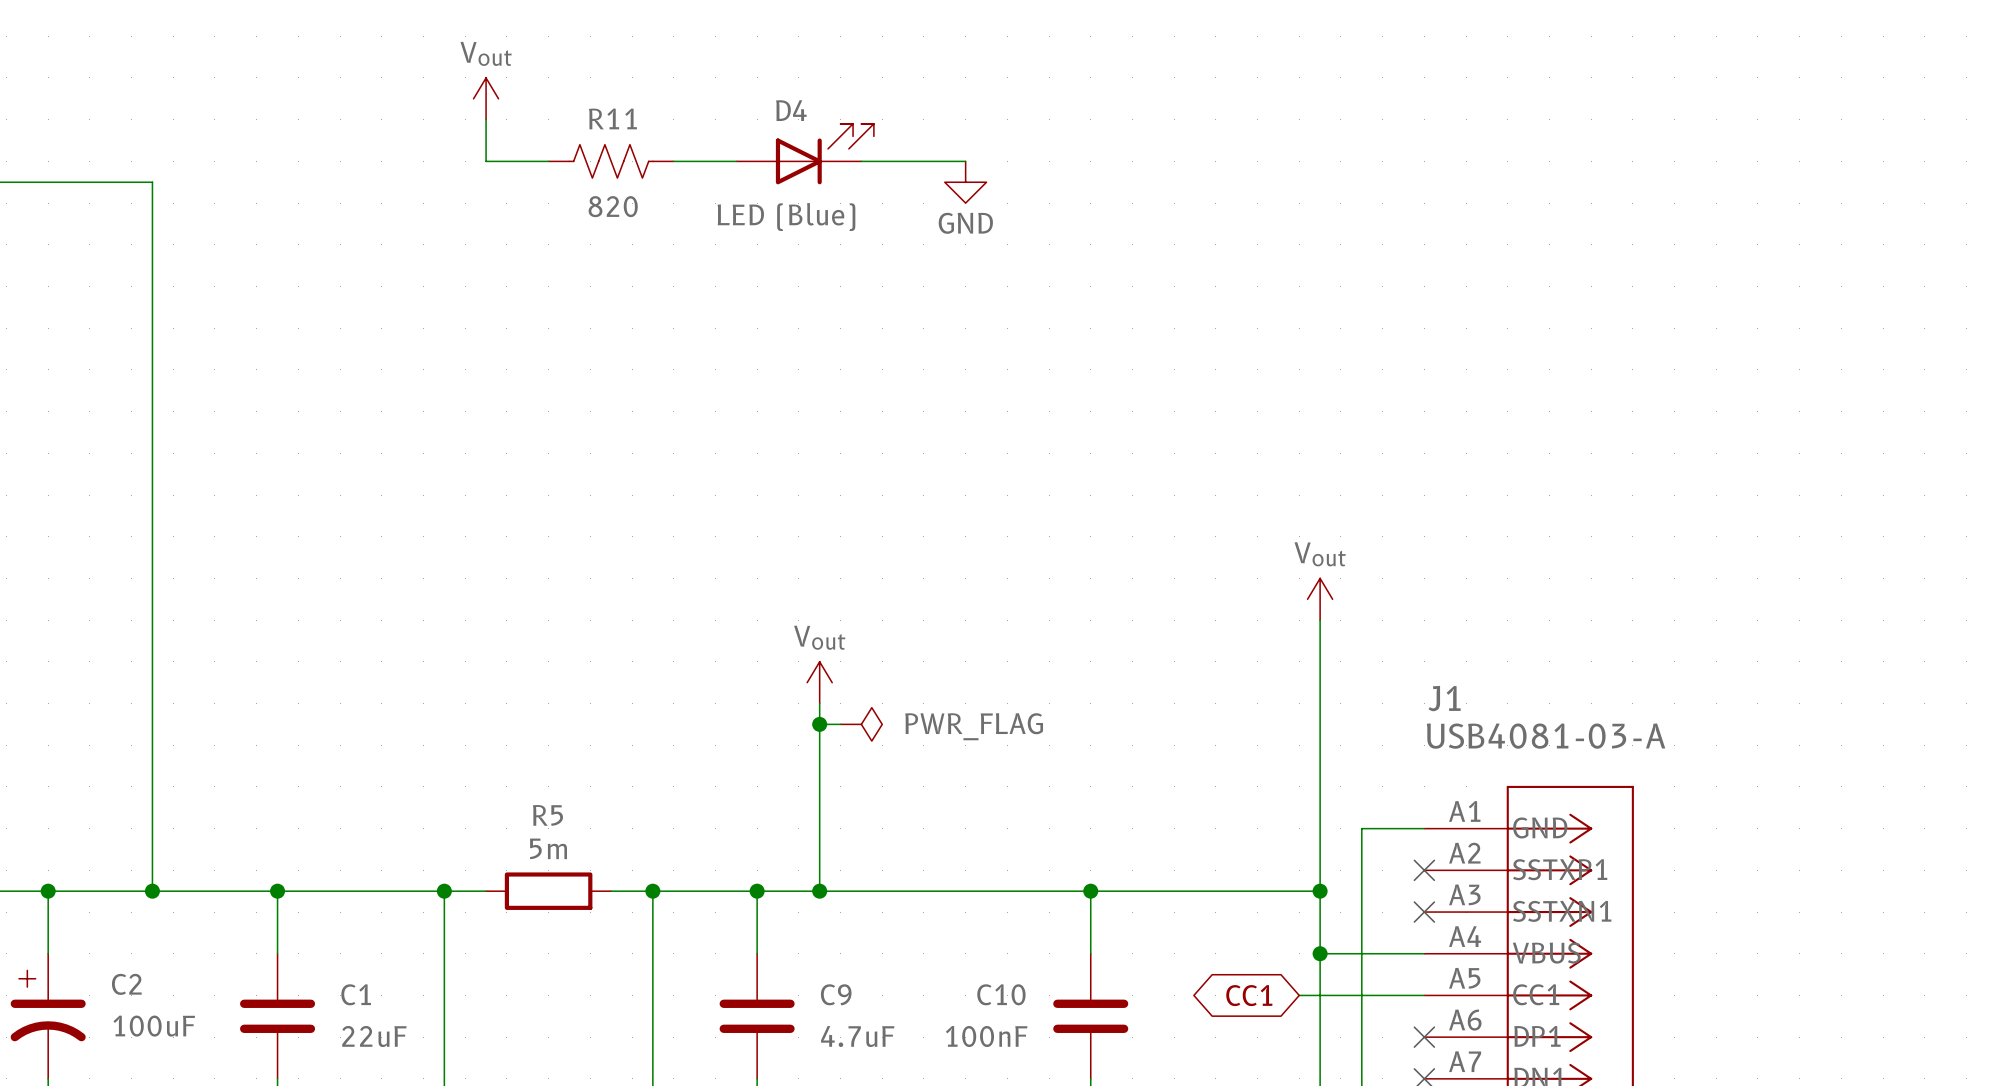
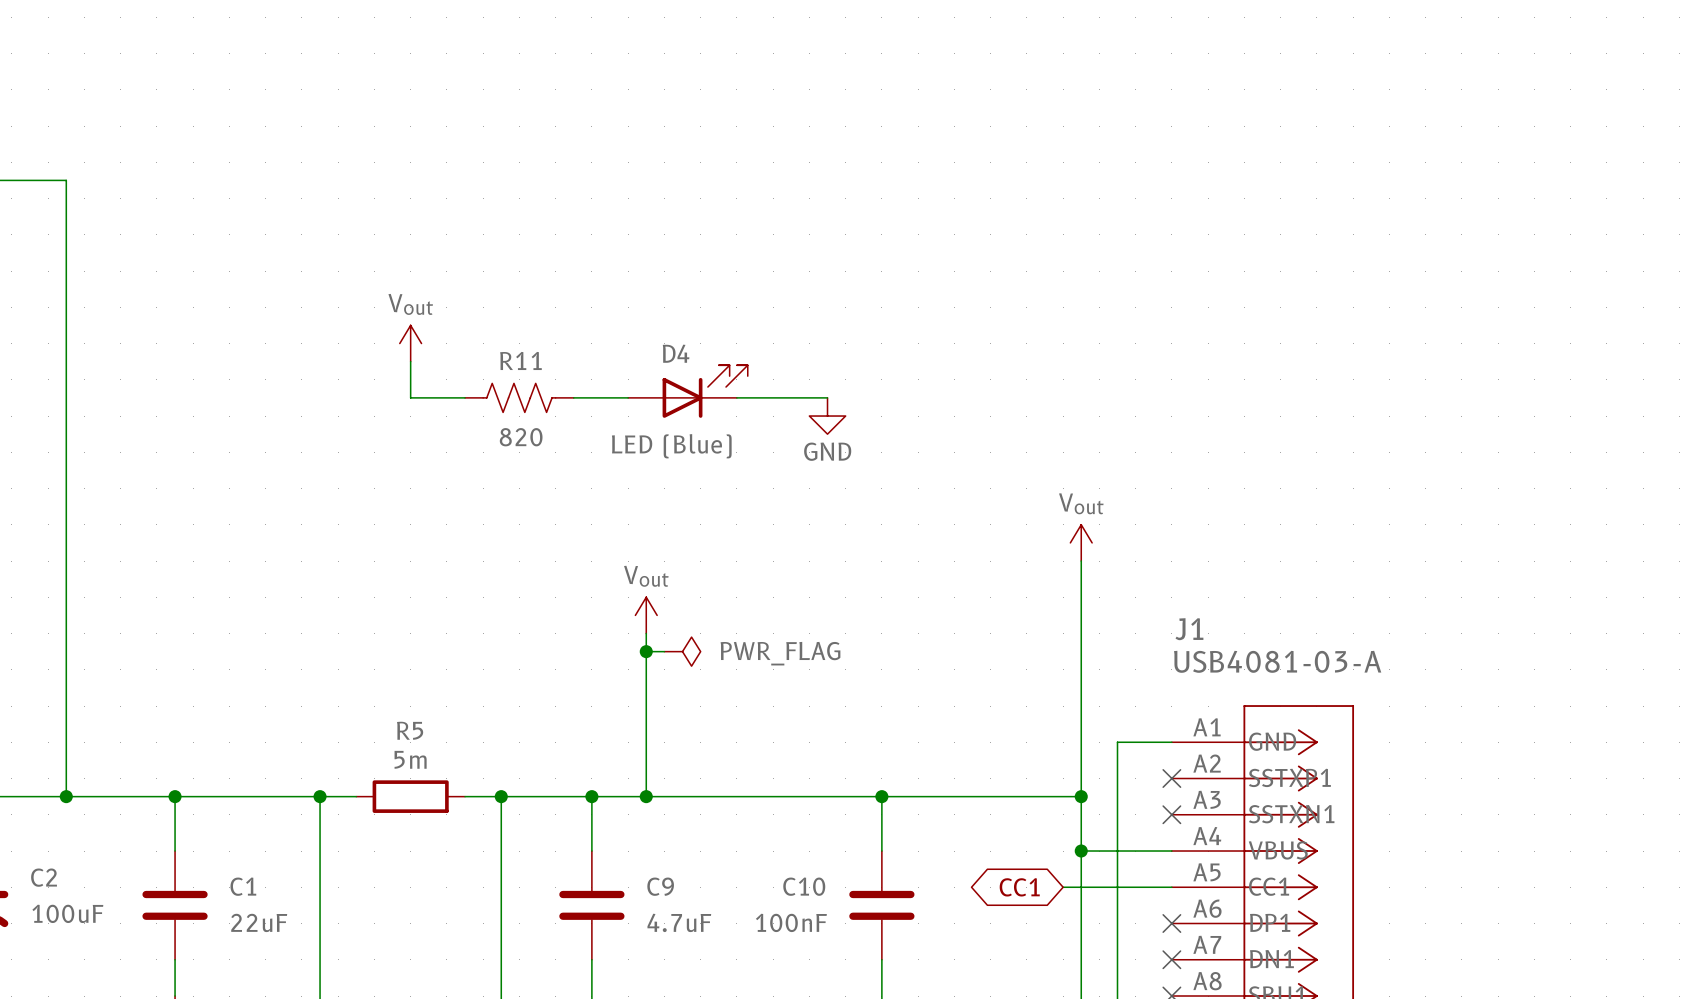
power symbol position: Vout (486, 98) -> Vout (410, 343)
wire: (486, 119) (486, 161) (548, 161) -> (410, 361) (410, 397) (465, 397)
D4 position: (805, 154) -> (687, 391)
R11 position: (611, 161) -> (519, 397)
wire: (673, 161) (736, 161) -> (573, 397) (628, 397)
wire: (861, 161) (965, 161) -> (736, 397) (827, 397)
power symbol position: GND (965, 182) -> GND (827, 416)

